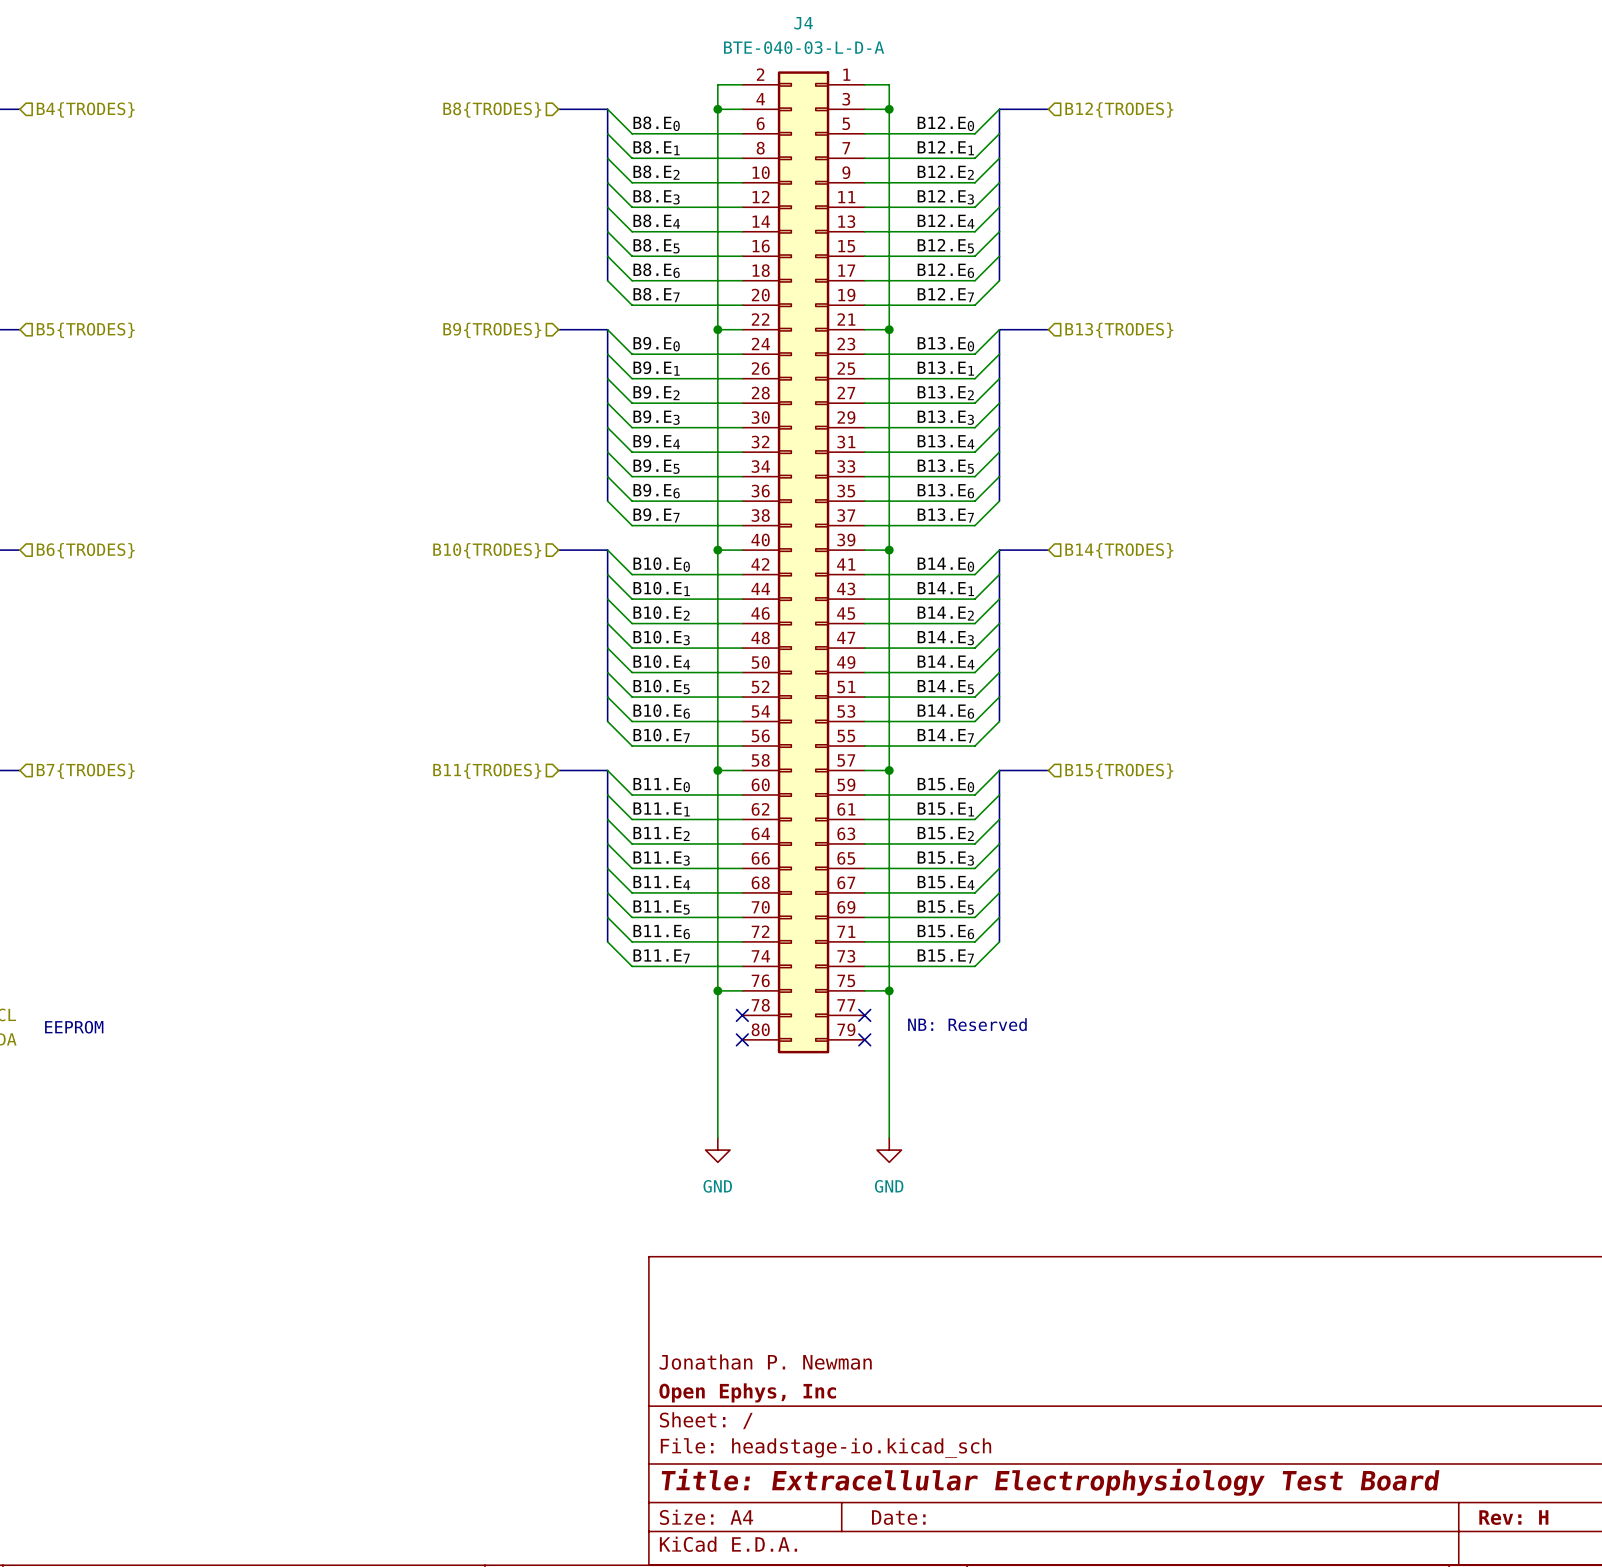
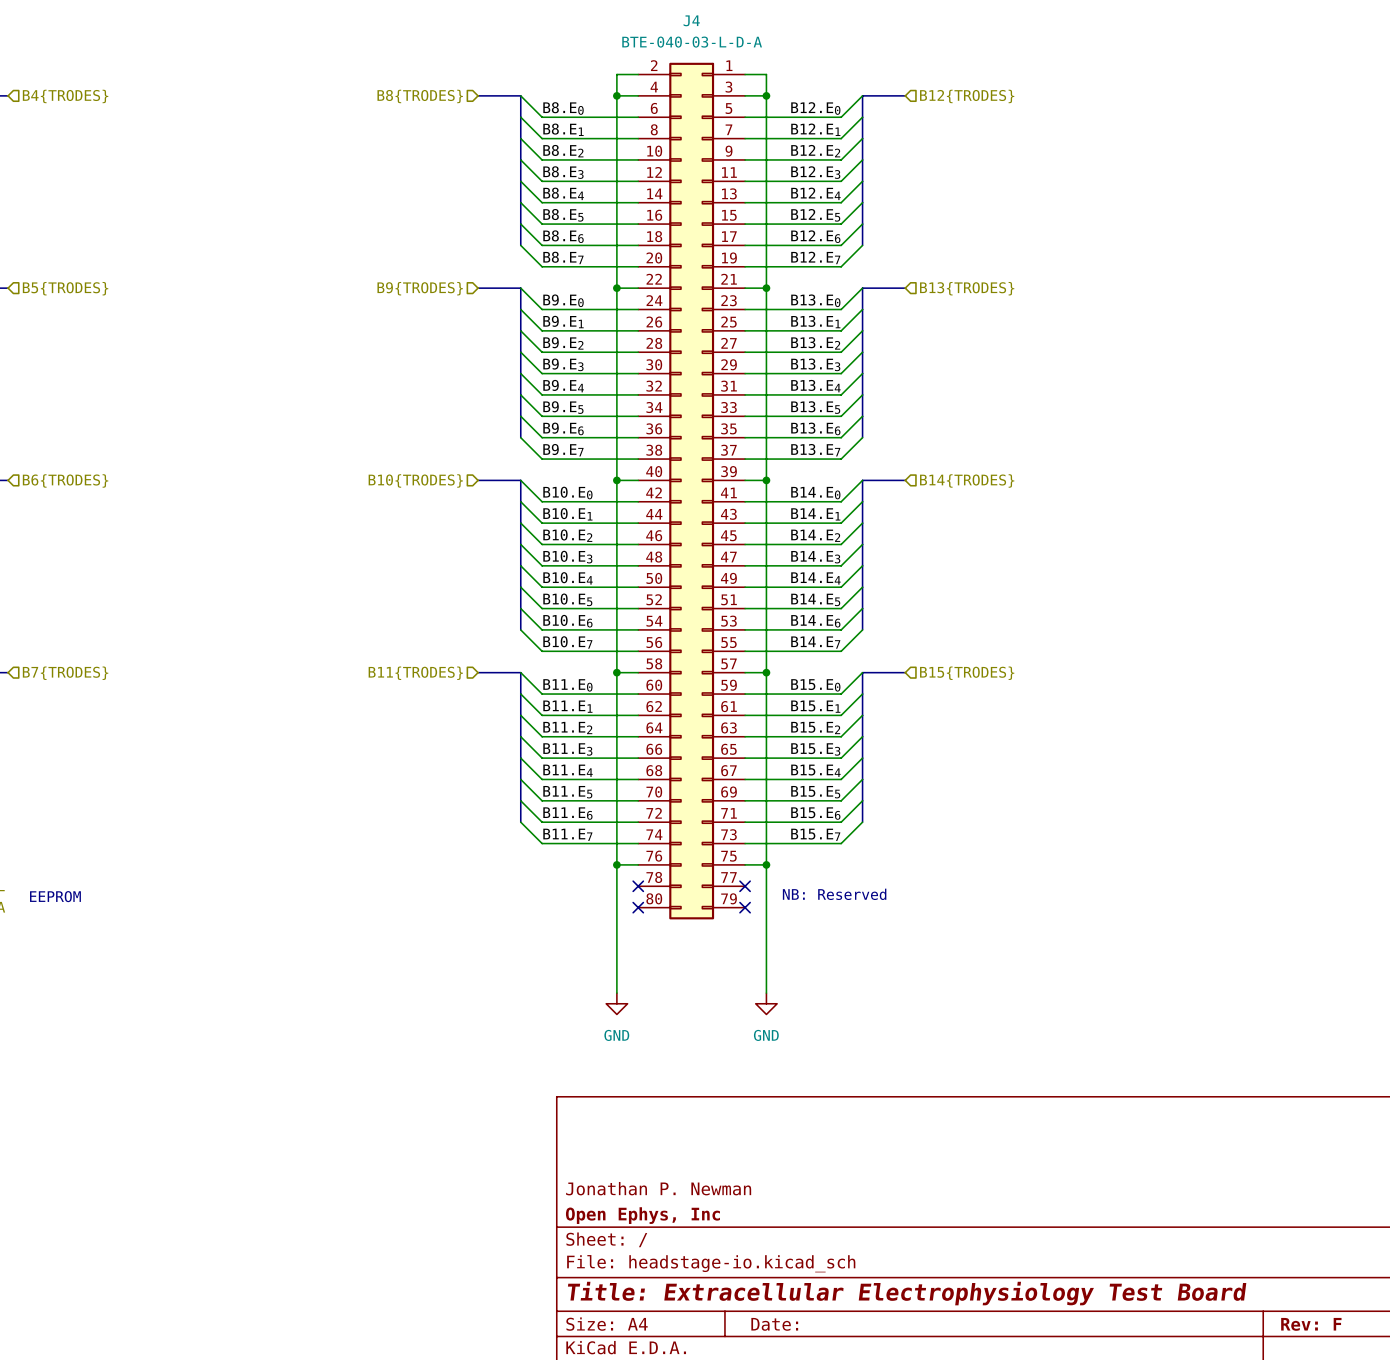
title block: Rev: H (1513, 1517) -> Rev: F (1311, 1324)

